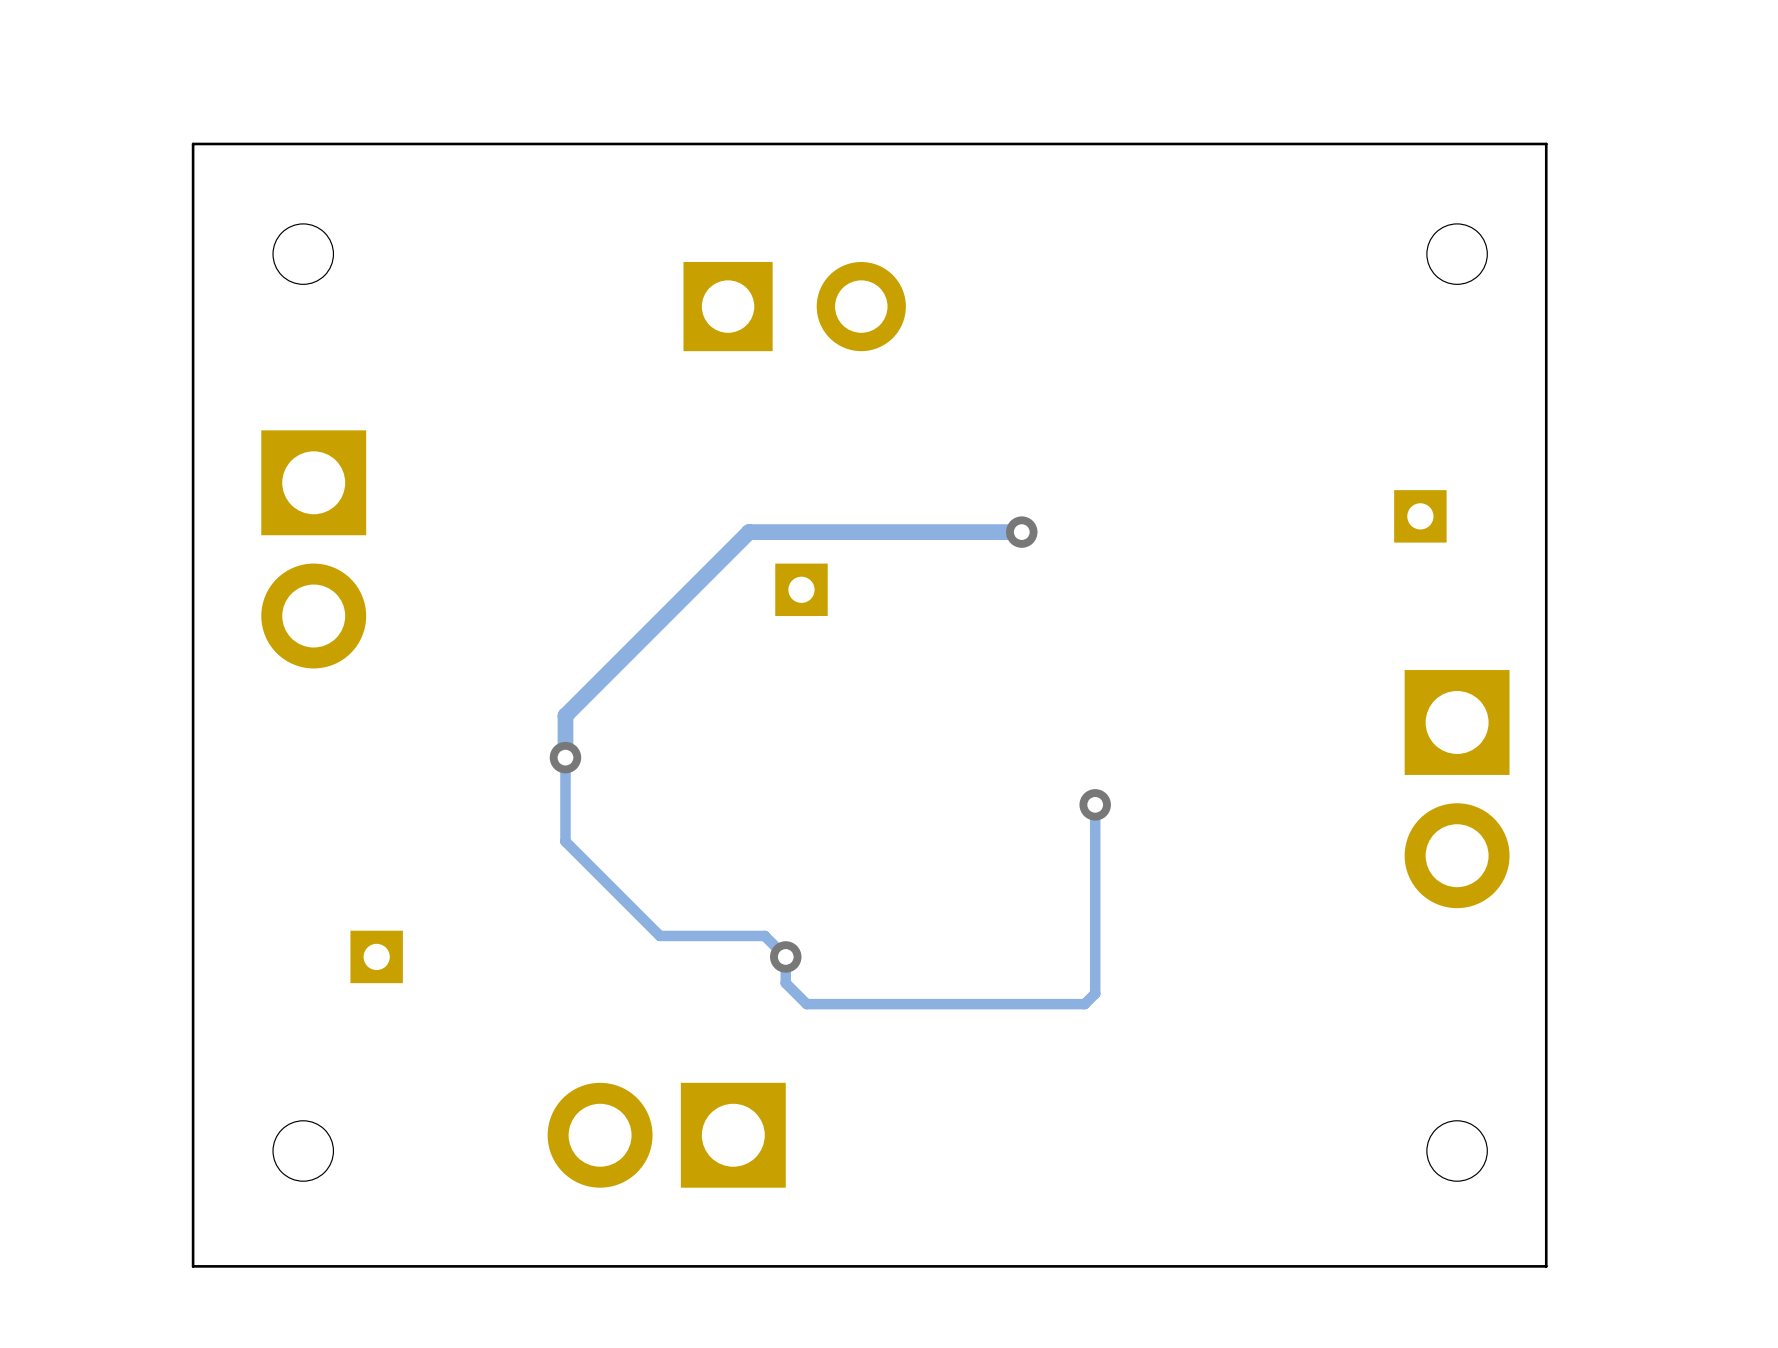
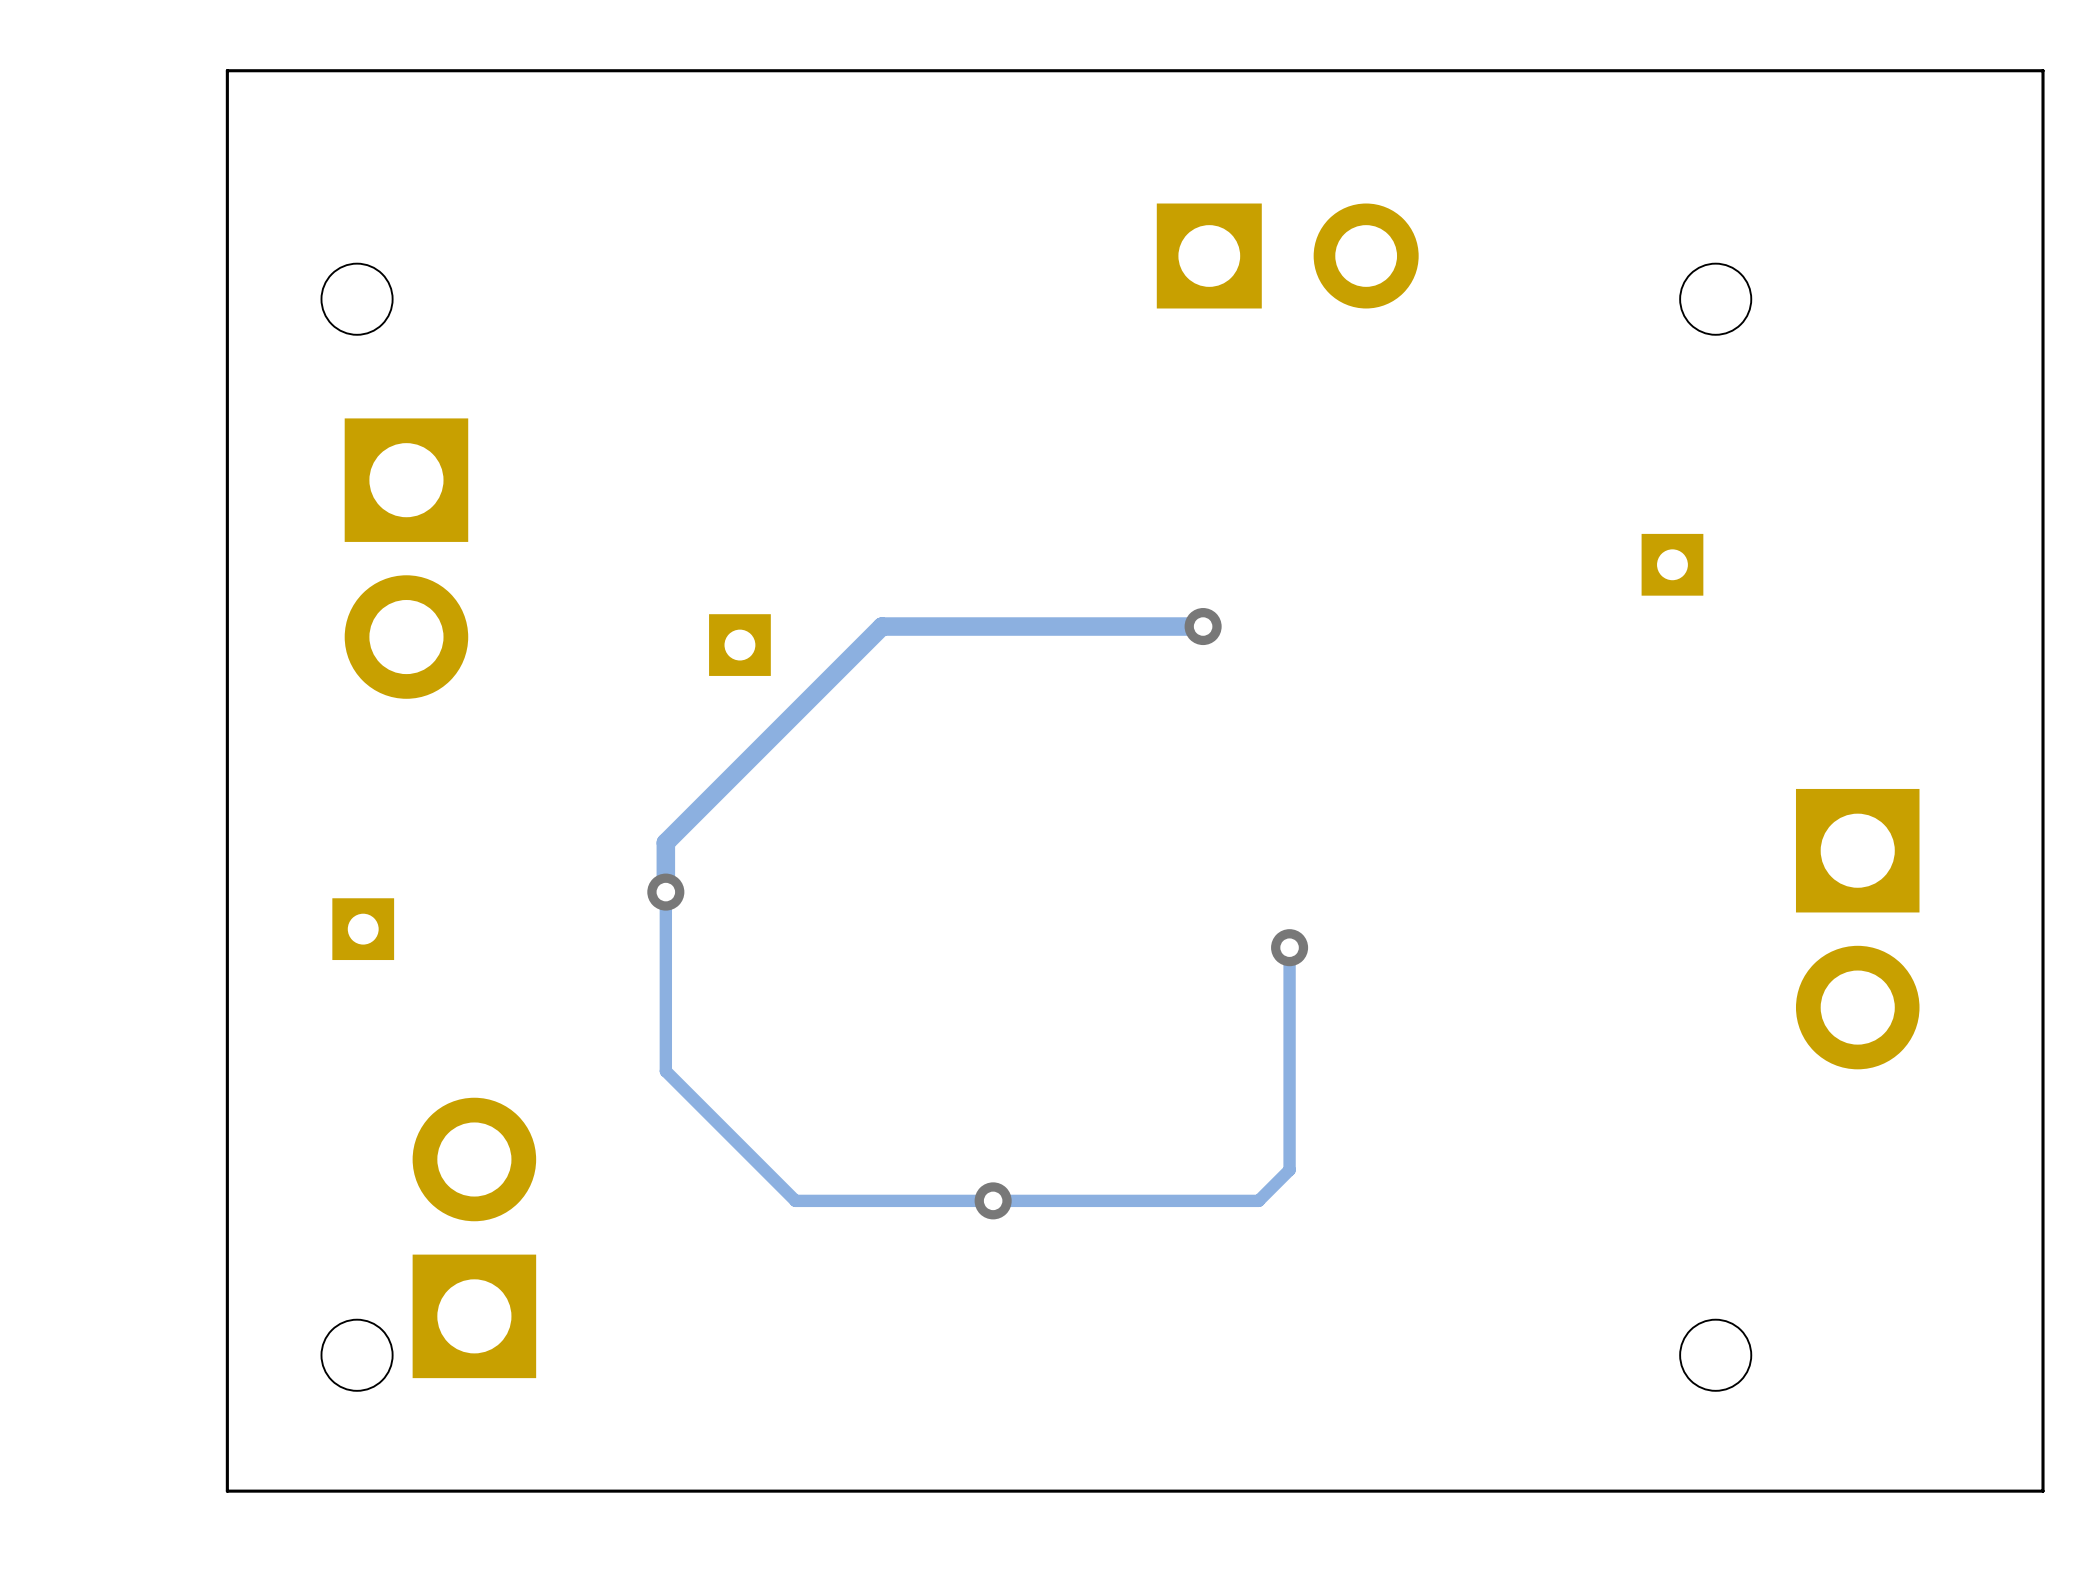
board edge: (193, 143) (1546, 143) (1546, 1266) -> (227, 169) (227, 70) (2043, 70) (2043, 1491) (1820, 1491)
part position: (794, 306) -> (1287, 256)
part position: (1420, 516) -> (1672, 564)
part position: (313, 549) -> (406, 558)
part position: (801, 589) -> (739, 645)
part position: (1457, 789) -> (1857, 929)
track: (565, 841) (659, 935) (764, 935) (785, 956) (785, 983) (806, 1004) (1084, 1004) -> (665, 990) (665, 1071) (795, 1200) (1258, 1200) (1277, 1182)
part position: (376, 956) -> (363, 929)
via position: (785, 956) -> (993, 1200)
part: none -> (474, 1237)
part: (666, 1135) -> none

